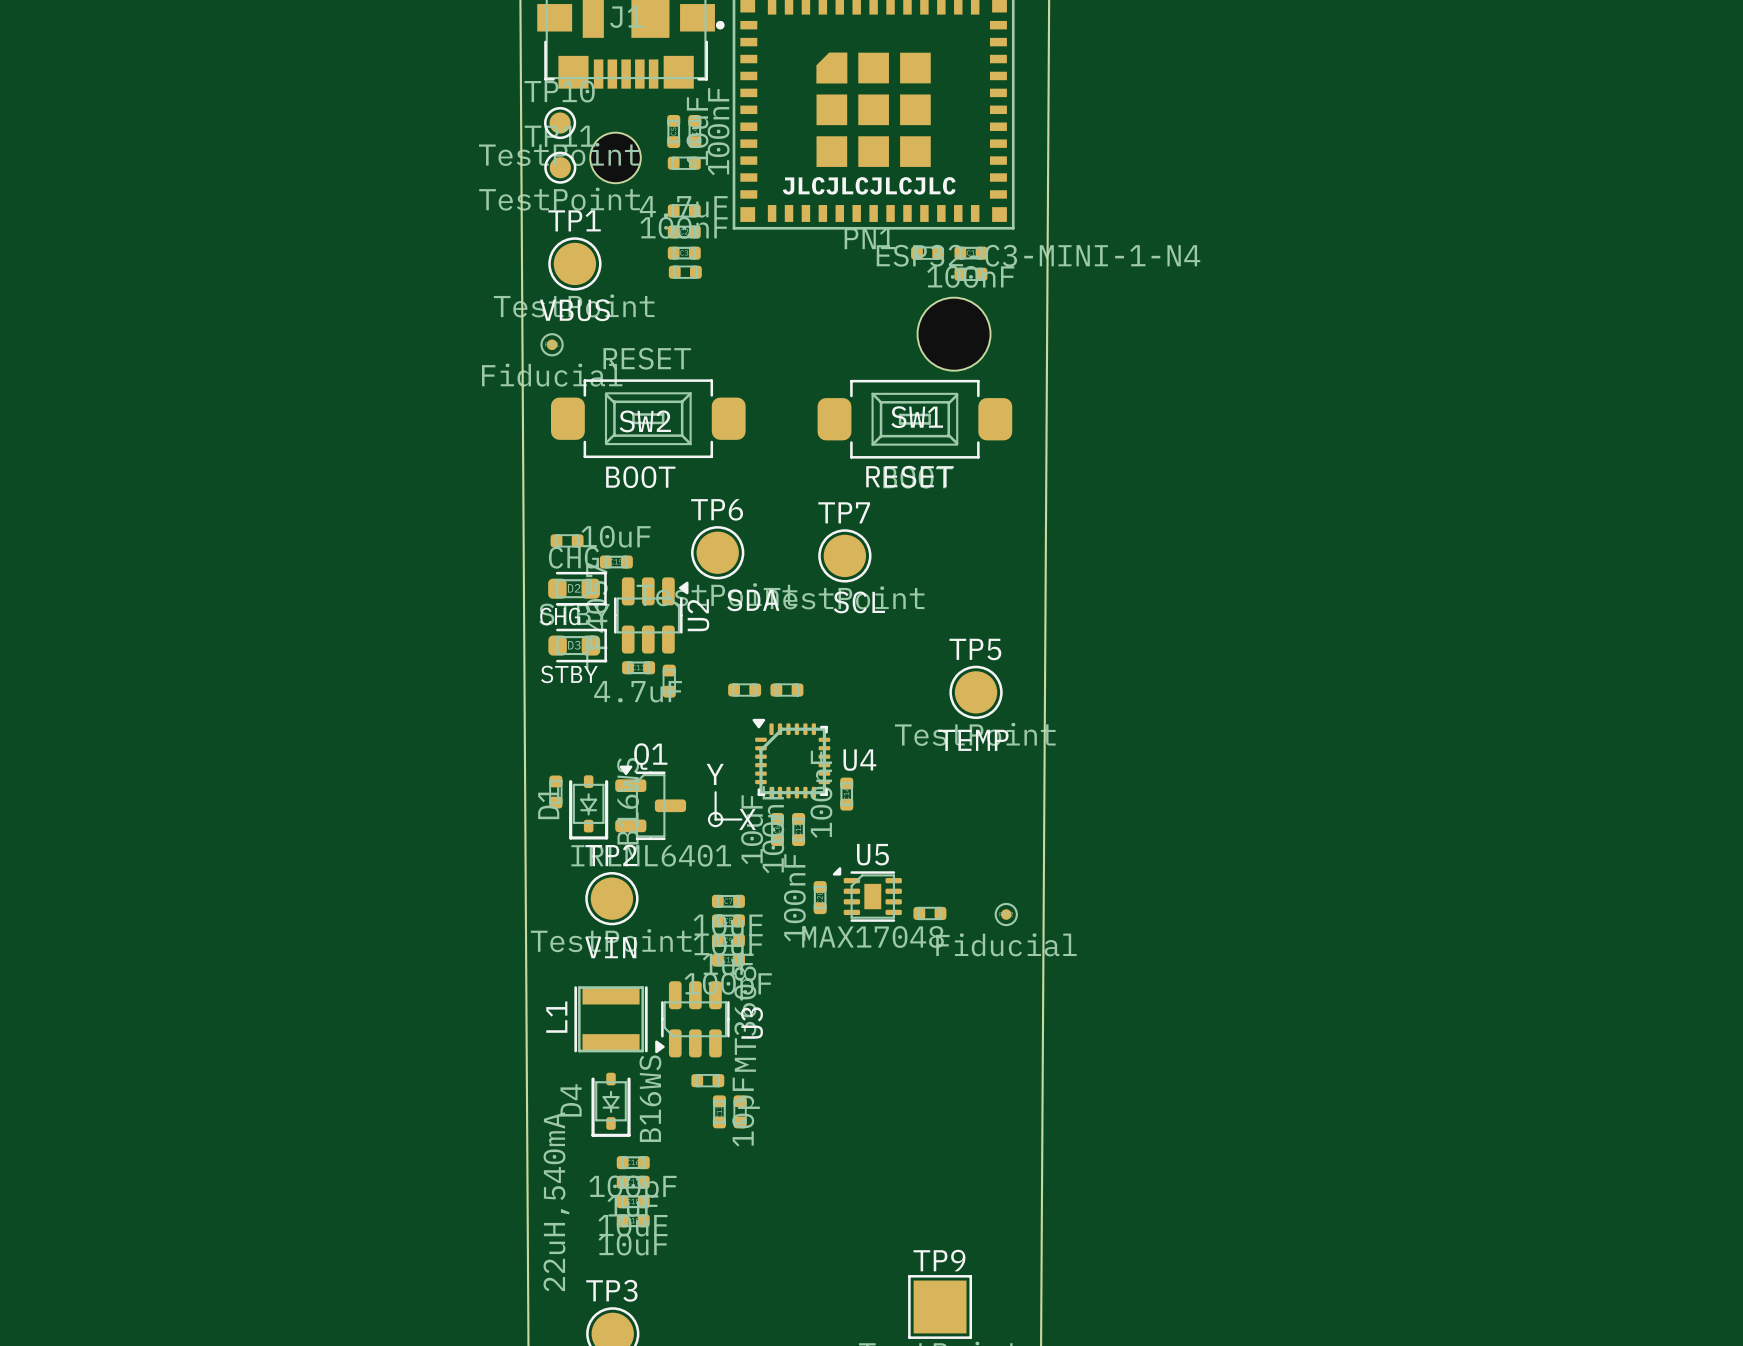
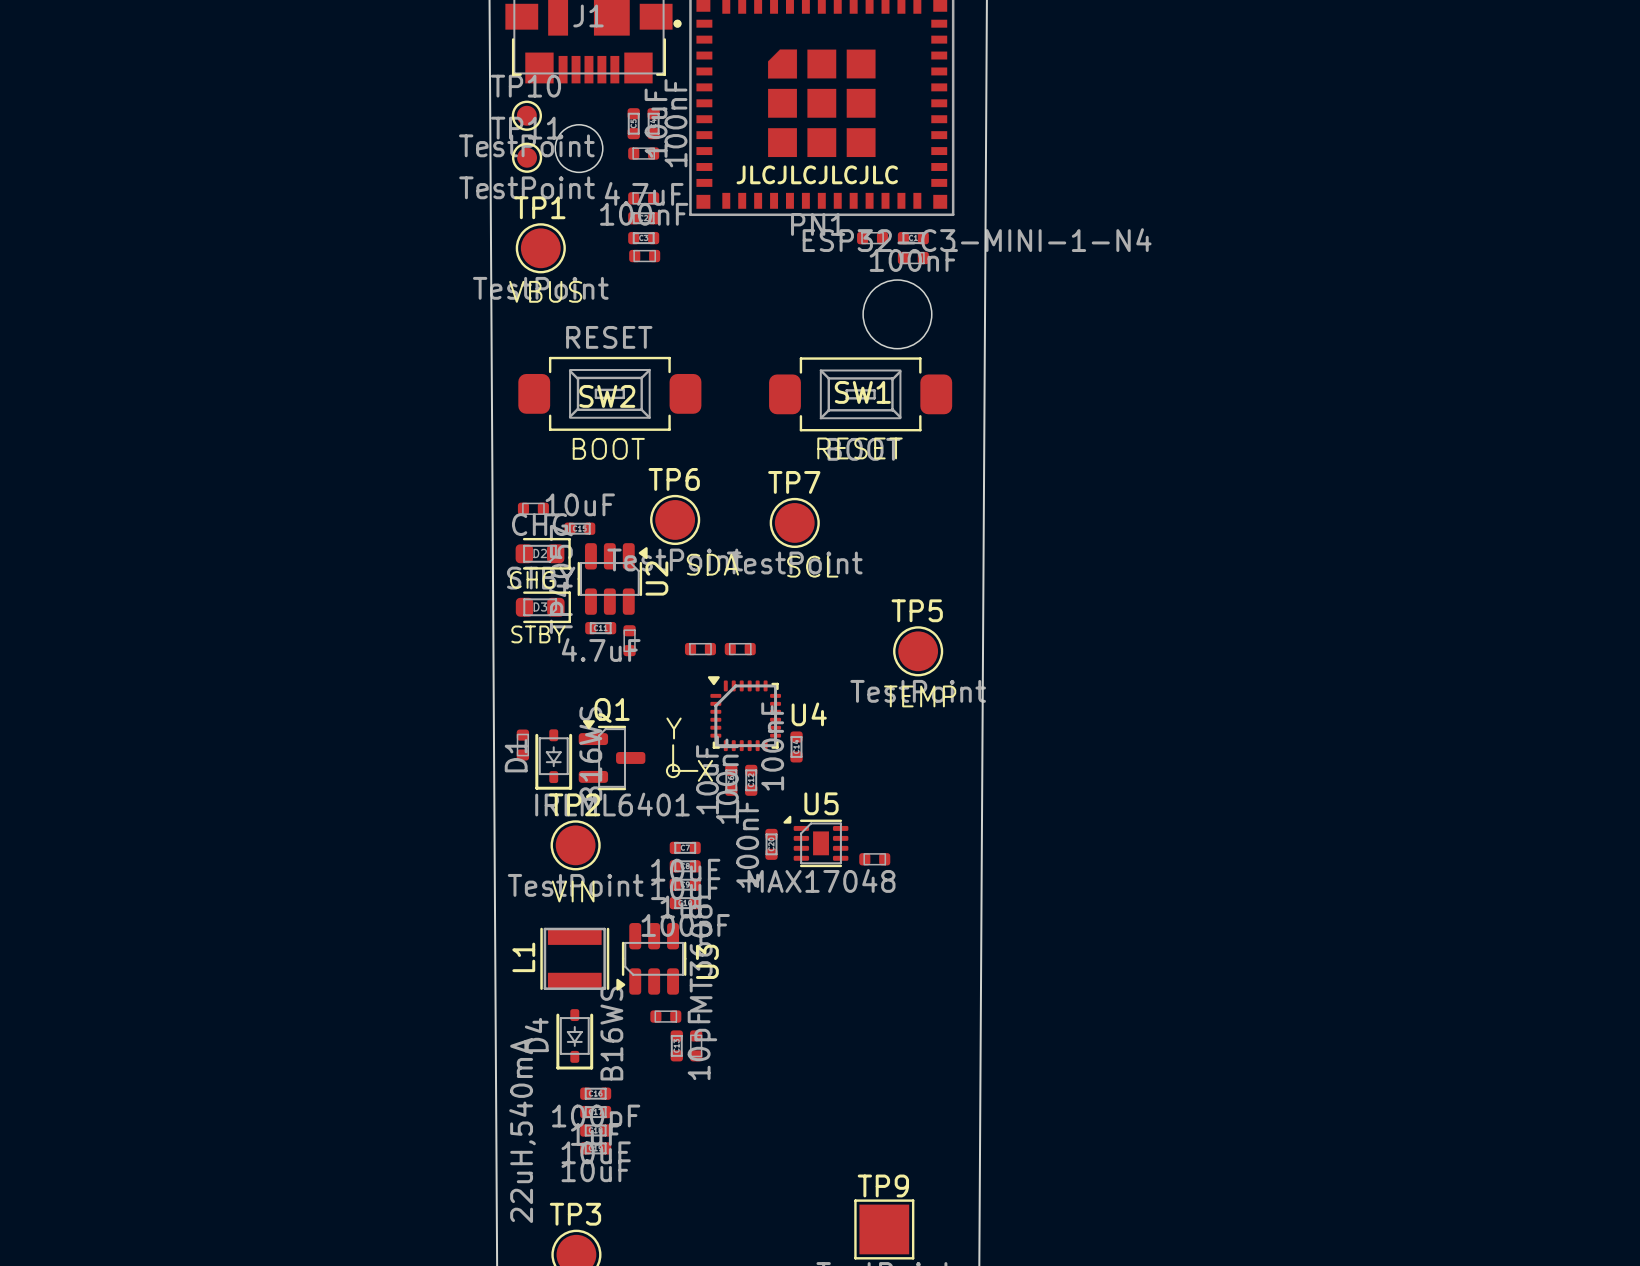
part: Fiducial (552, 344) -> none
part: Fiducial (1006, 914) -> none

